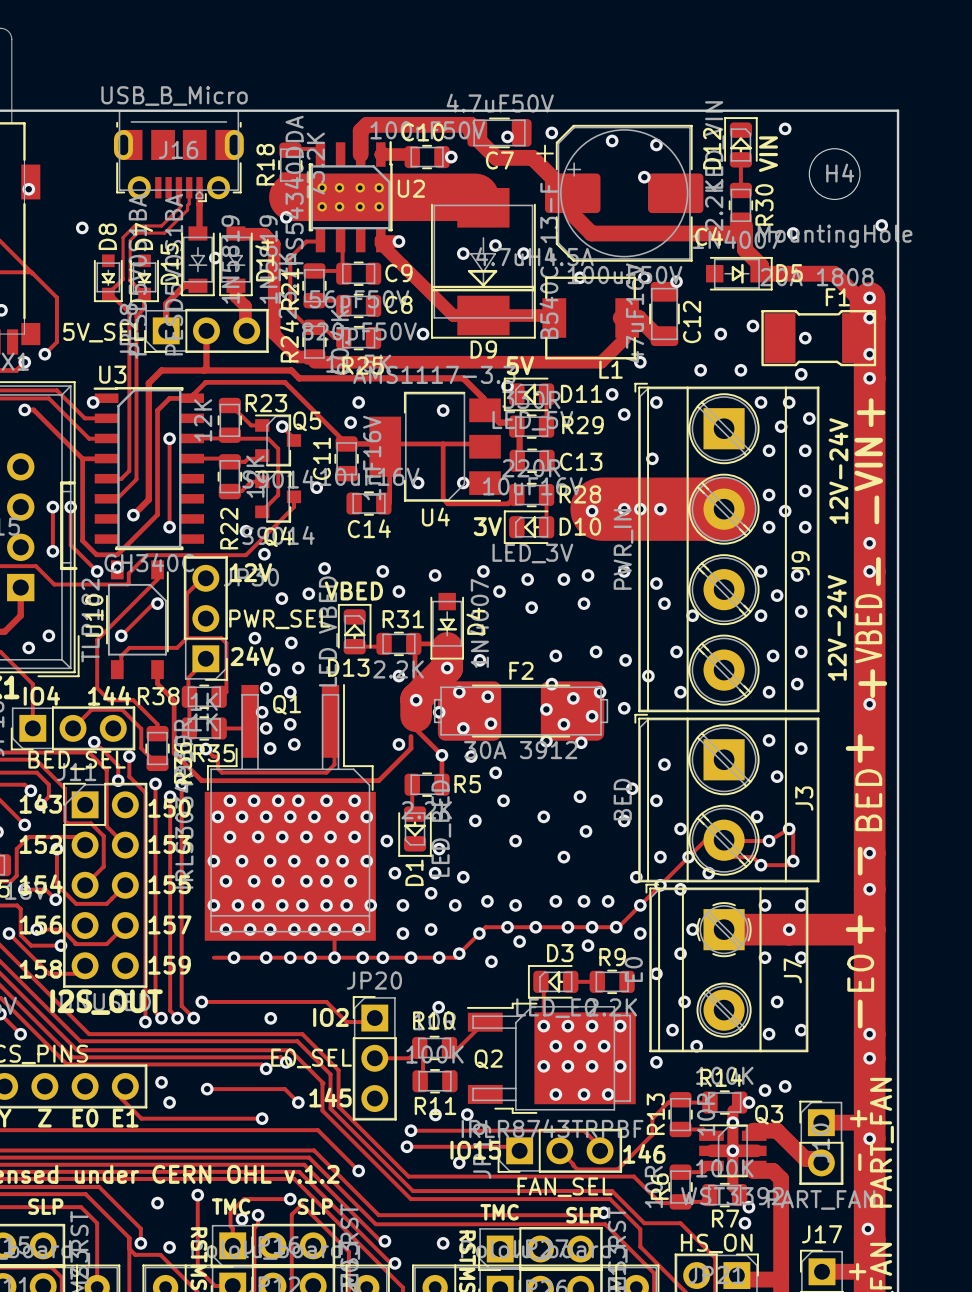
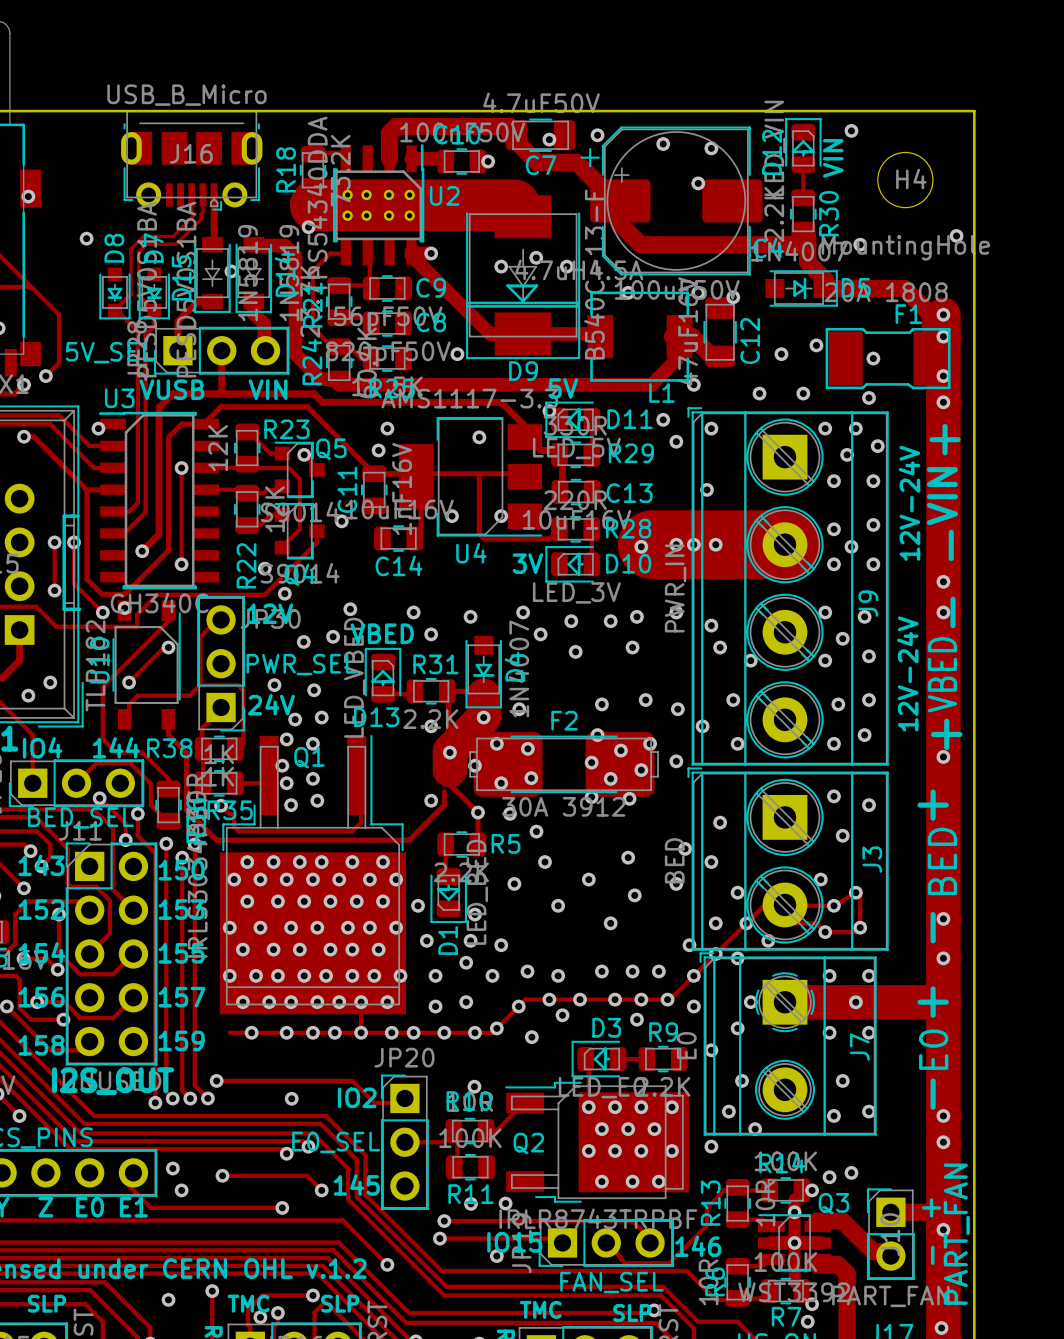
text: none -> VUSB (171, 389)
text: none -> VIN (268, 389)

